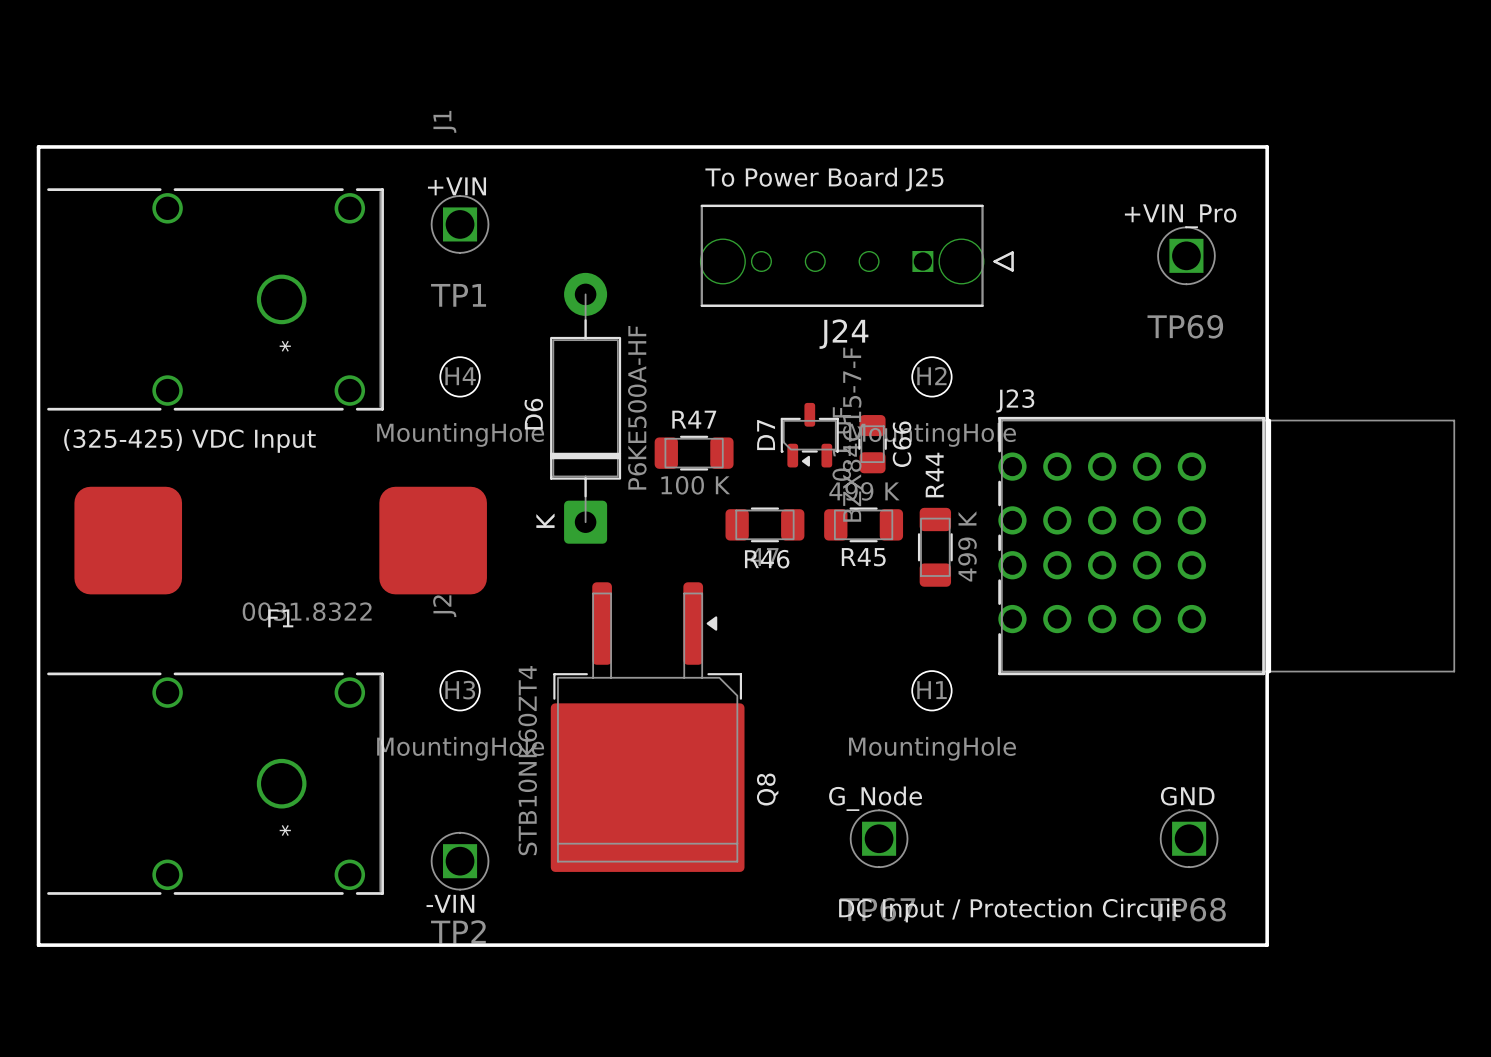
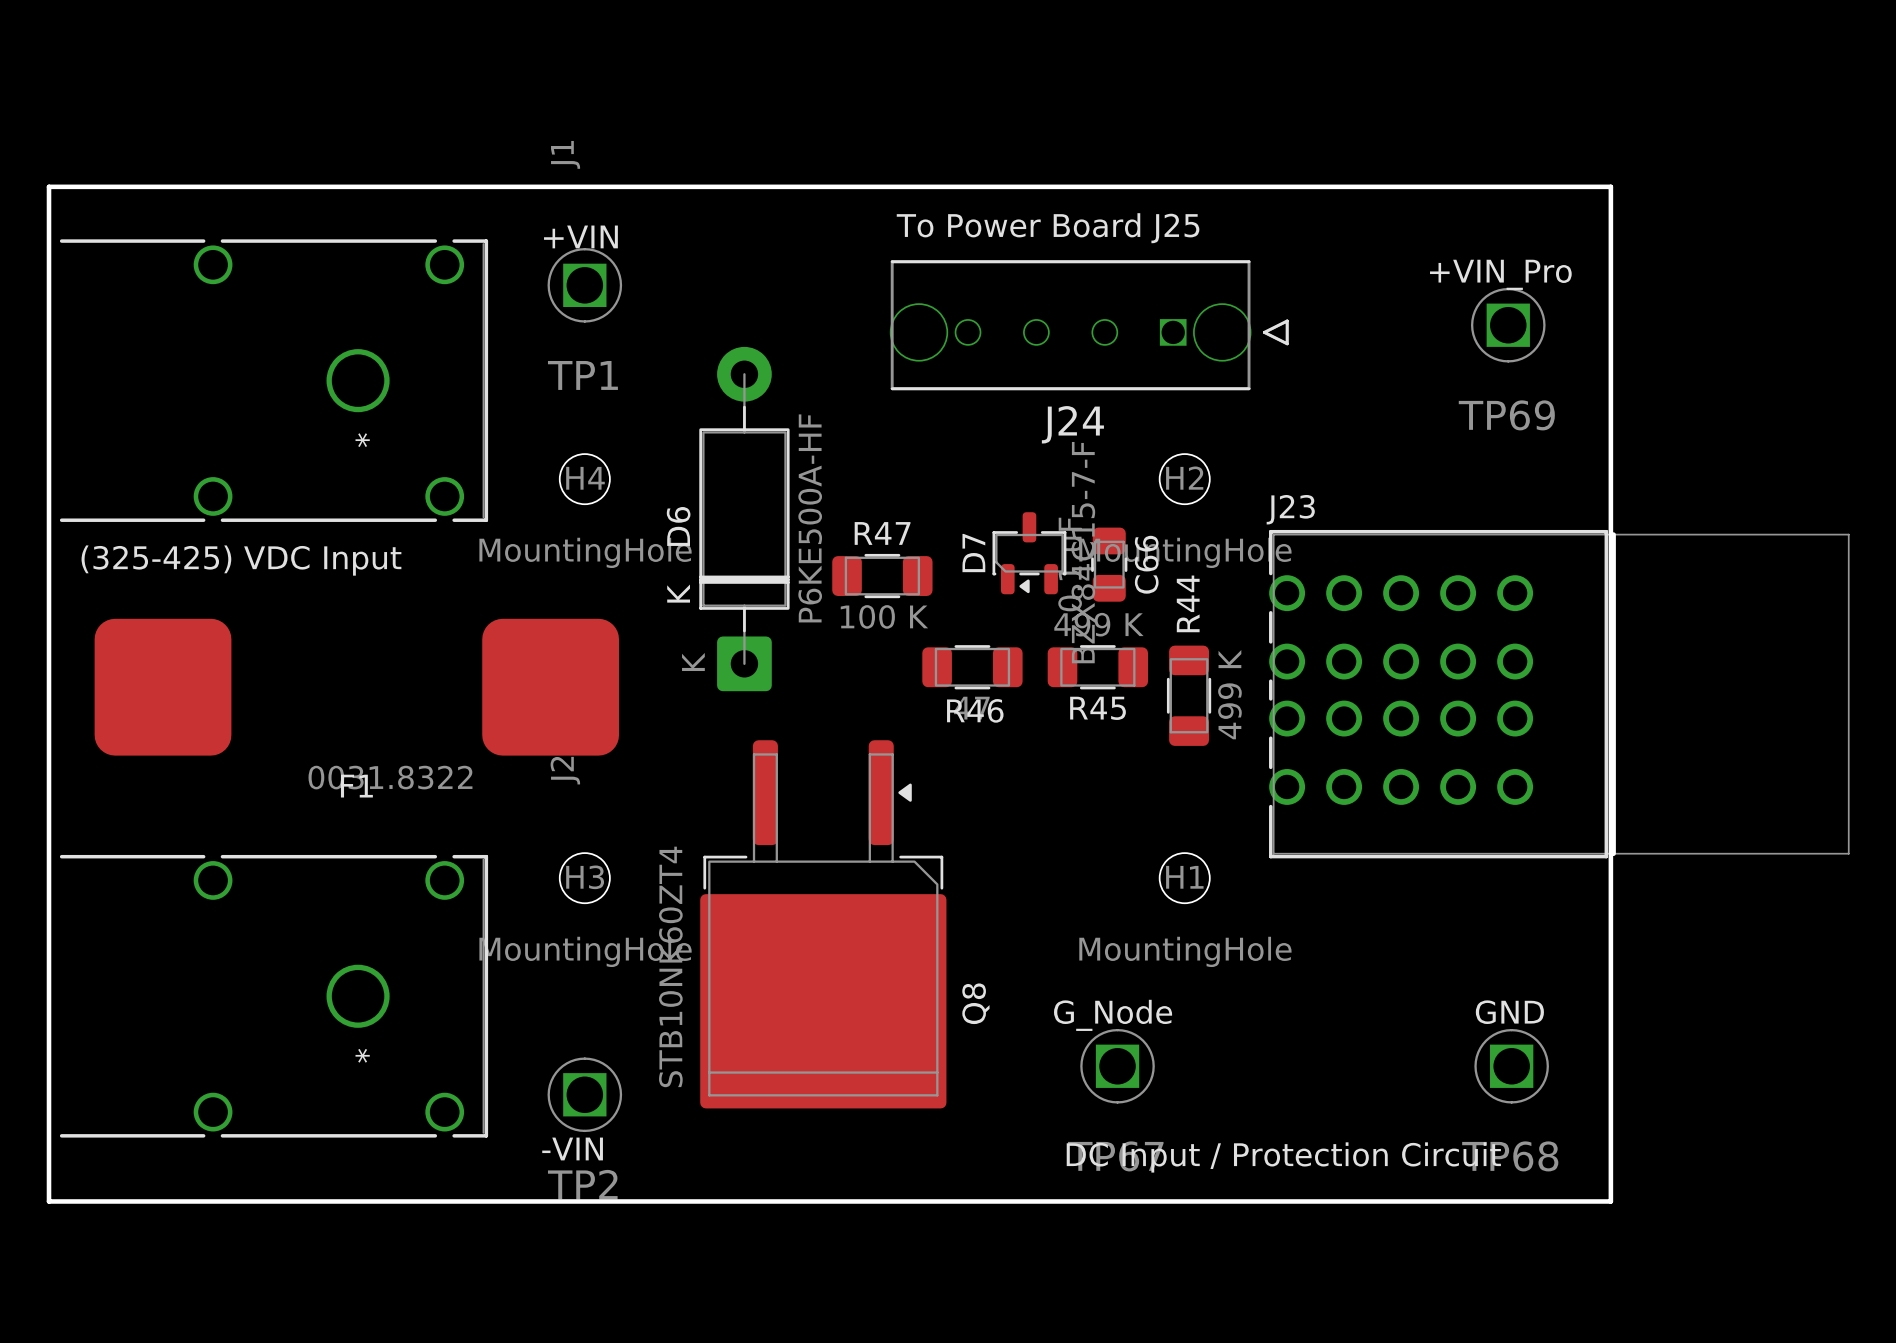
D6 footprint: [550, 272, 622, 544] -> [699, 346, 790, 692]

